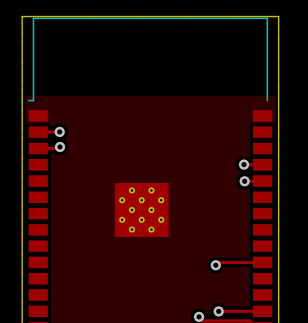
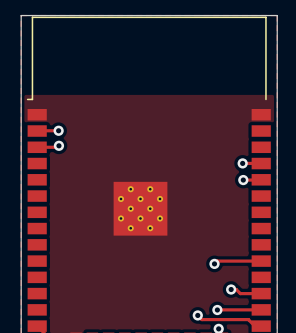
track: none -> (231, 289) (236, 289) (240, 293) (261, 293)
via: none -> (231, 289)

